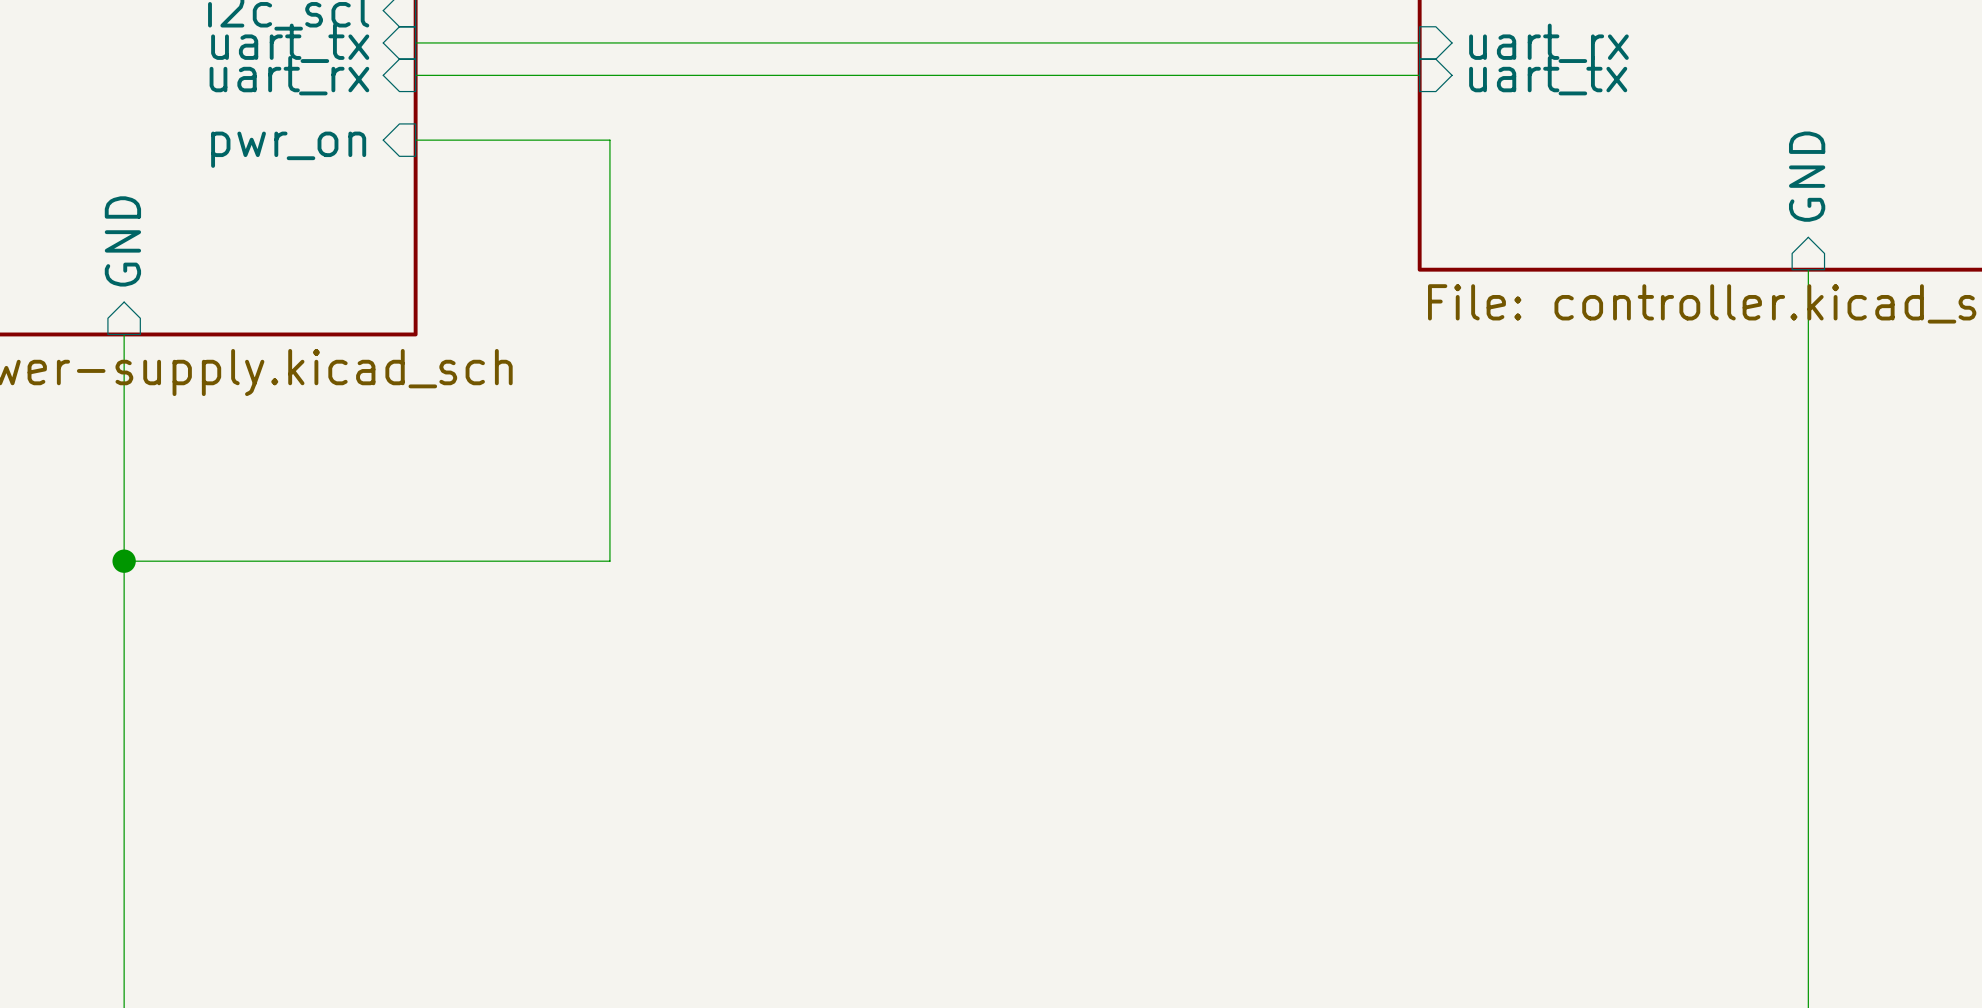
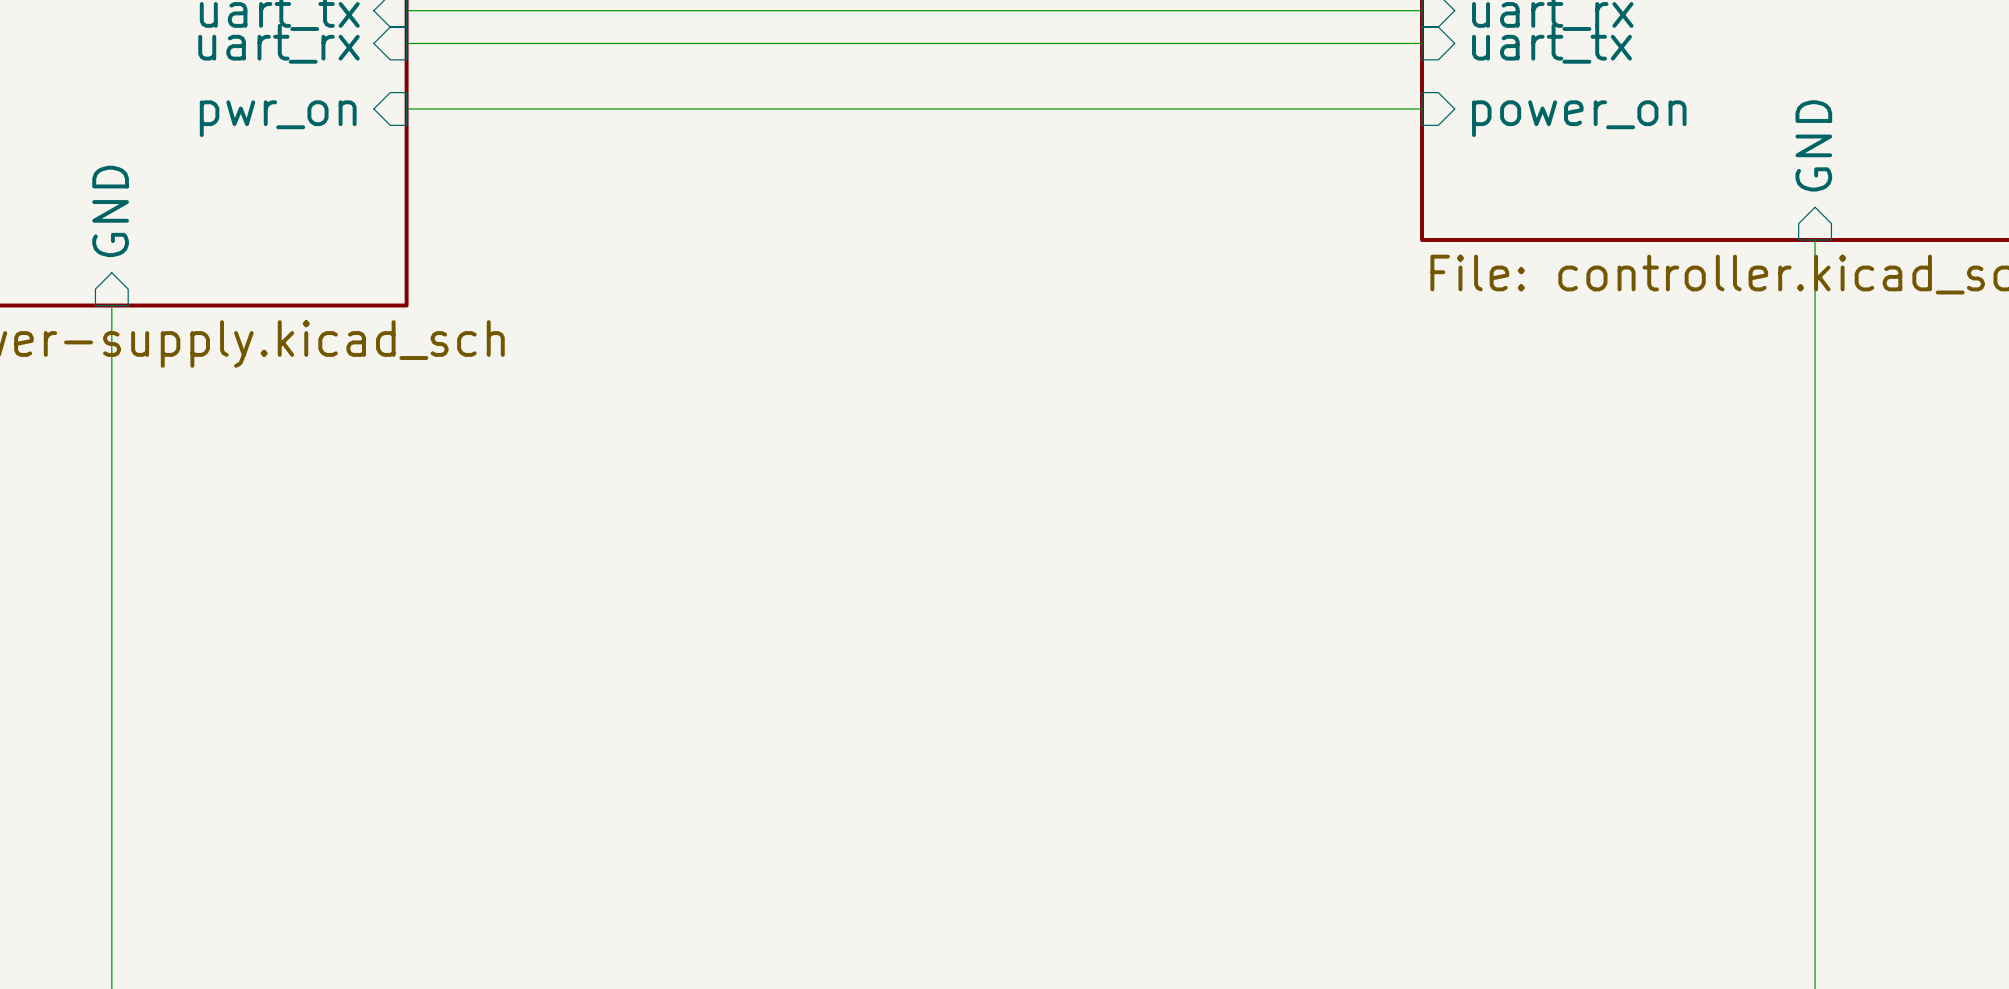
wire: (609, 140) (609, 561) (124, 561) -> (603, 108) (1422, 108)
sheet pin: none -> power_on (1579, 118)
junction: (124, 561) -> none

